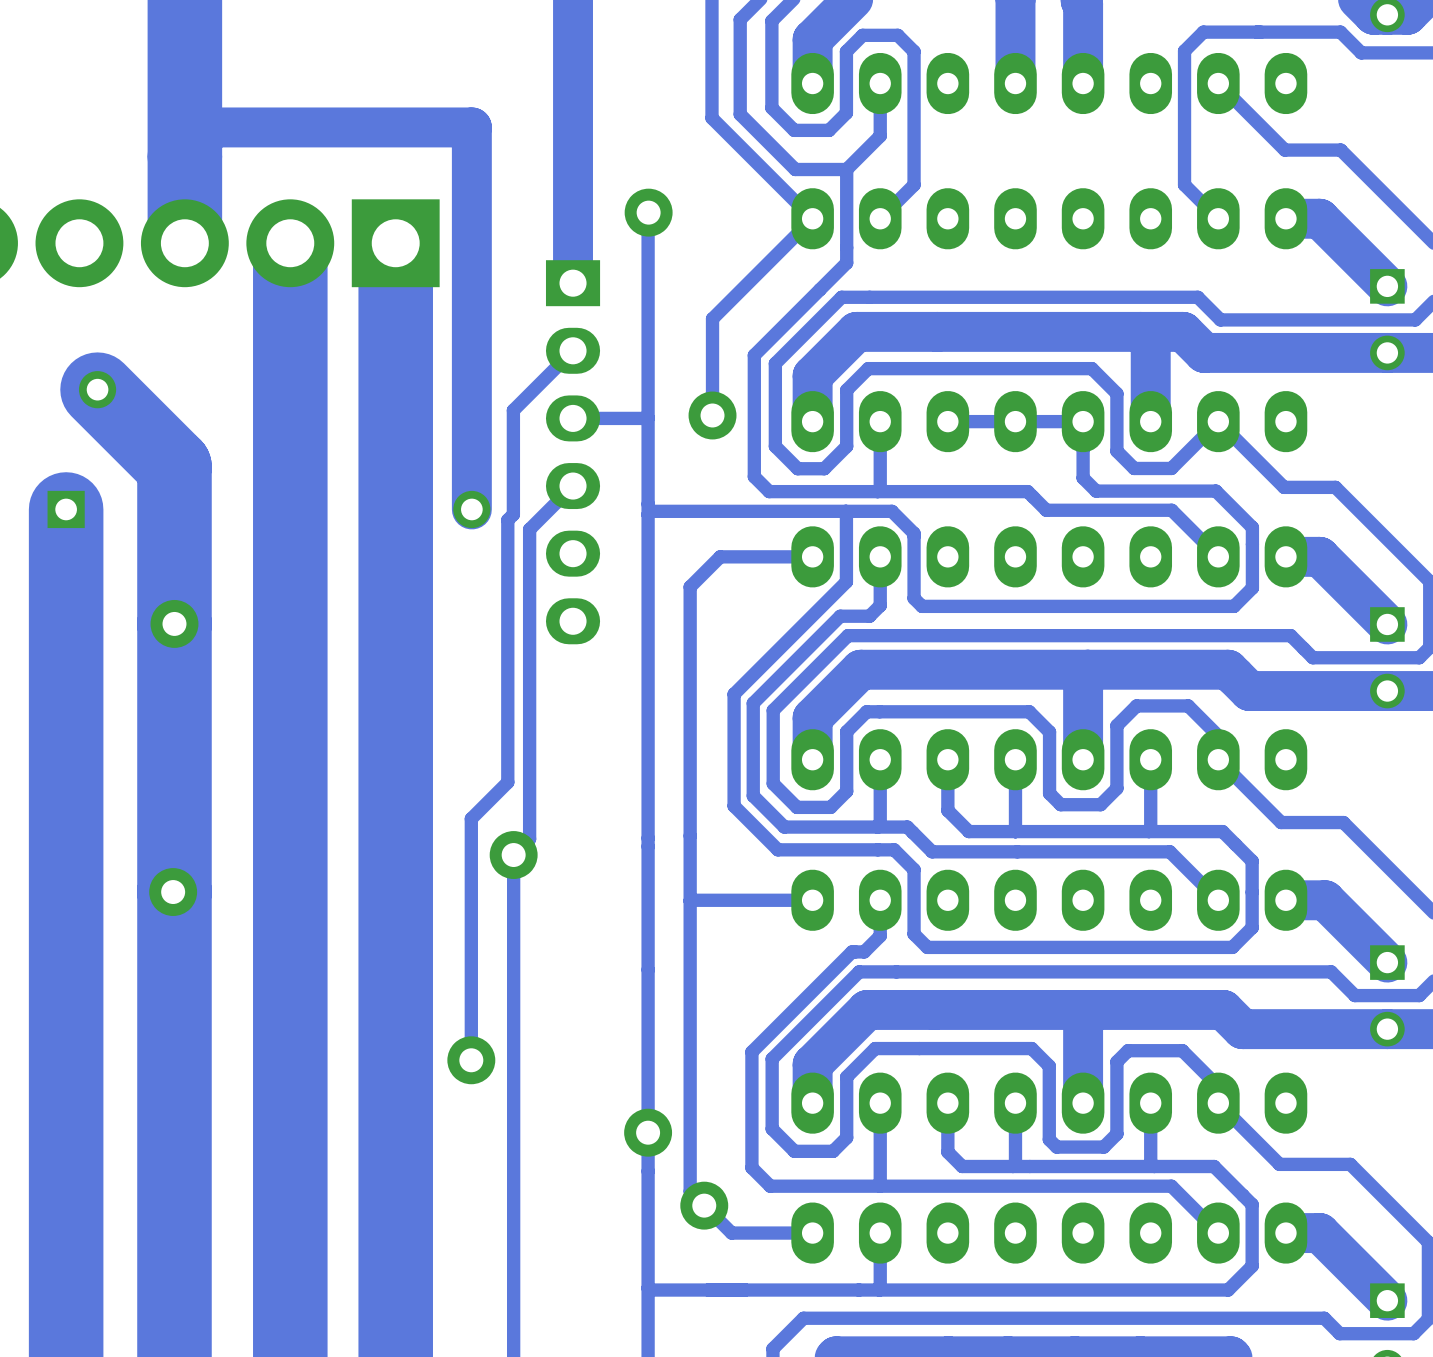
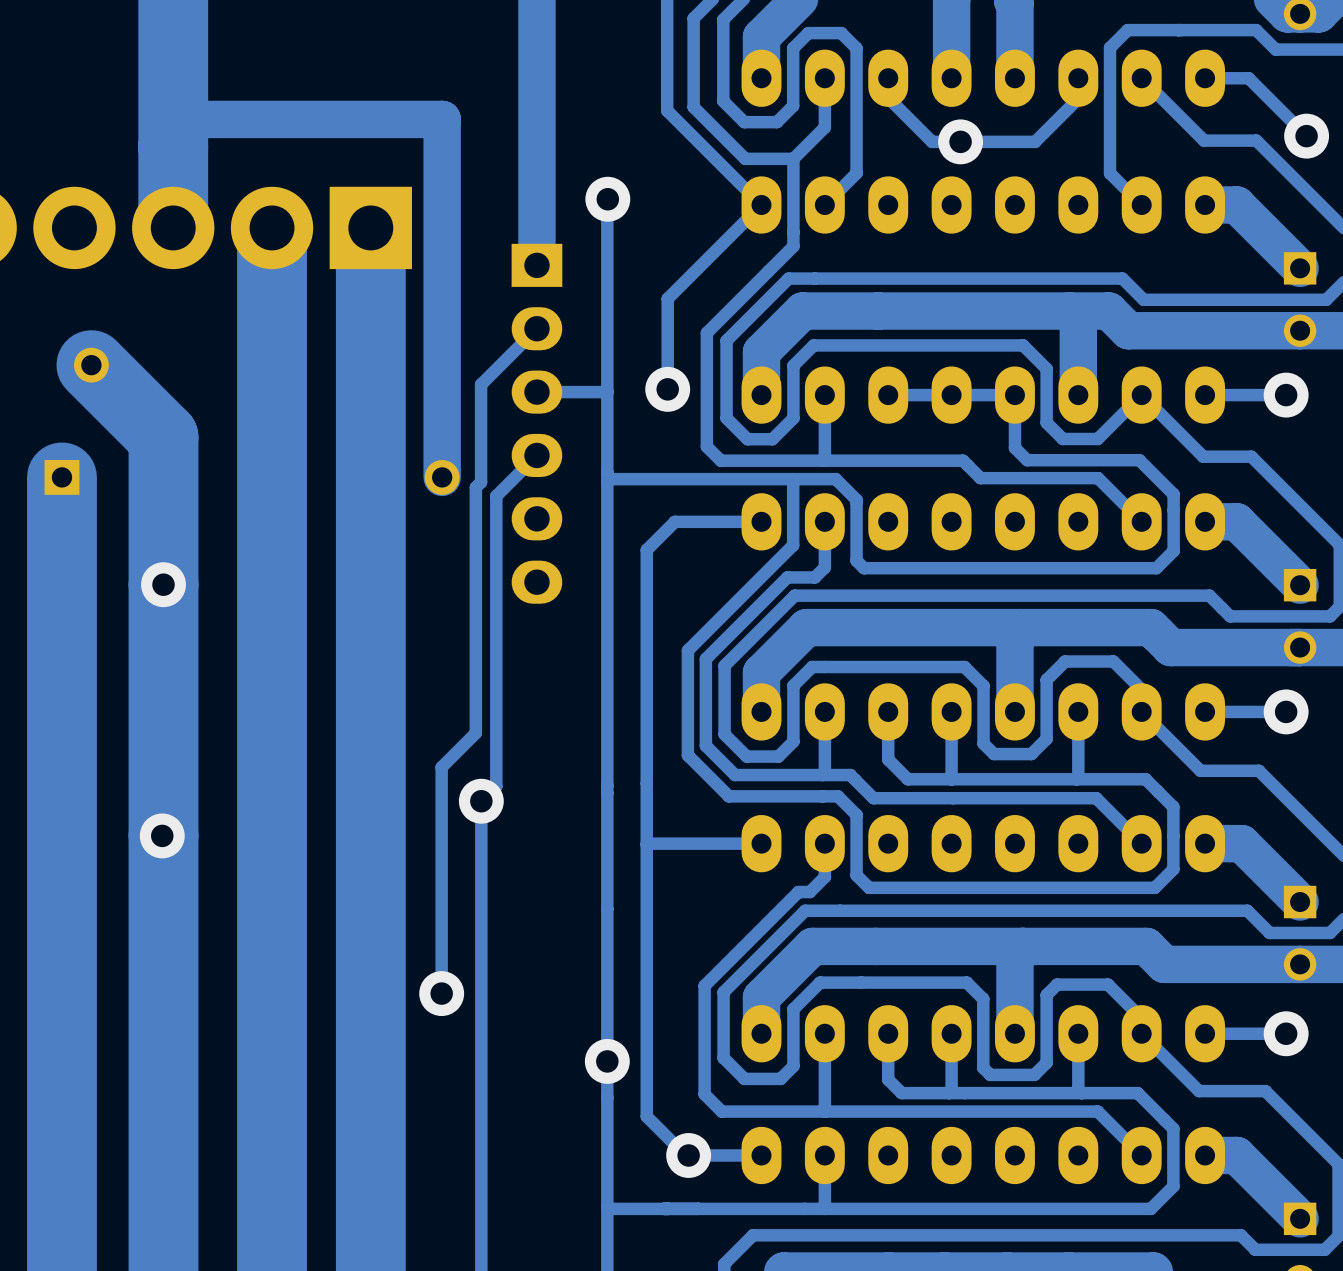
track: none -> (1078, 78) (1078, 98) (1035, 141) (932, 141) (888, 97) (888, 78)
track: none -> (1205, 78) (1248, 78) (1306, 136)
via: none -> (1306, 136)
via: none -> (960, 141)
track: none -> (1286, 395) (1205, 395)
via: none -> (1286, 395)
track: none -> (1286, 711) (1205, 711)
via: none -> (1286, 711)
track: none -> (1286, 1033) (1205, 1033)
via: none -> (1286, 1033)
via position: (704, 1205) -> (688, 1155)

